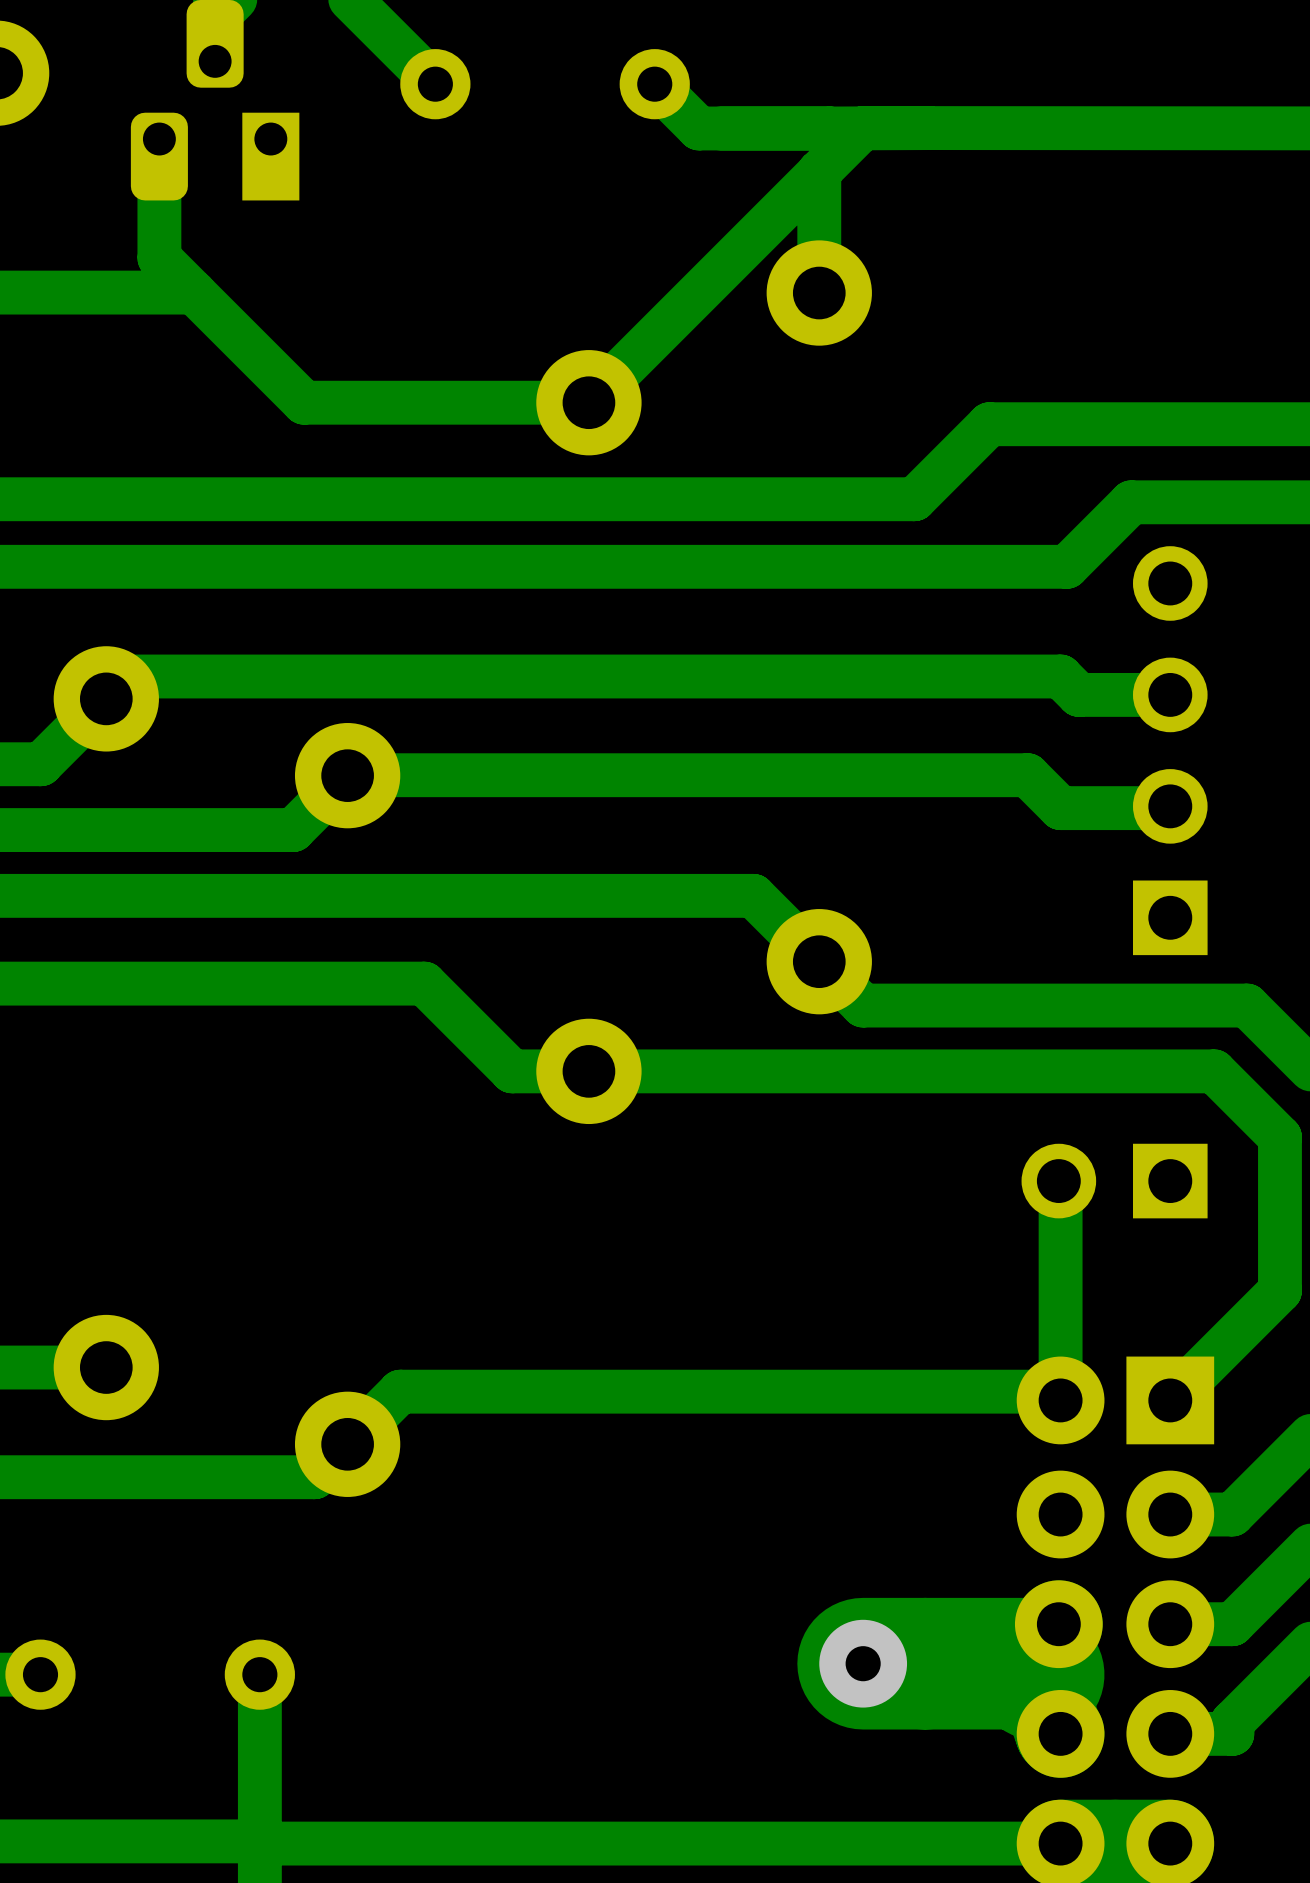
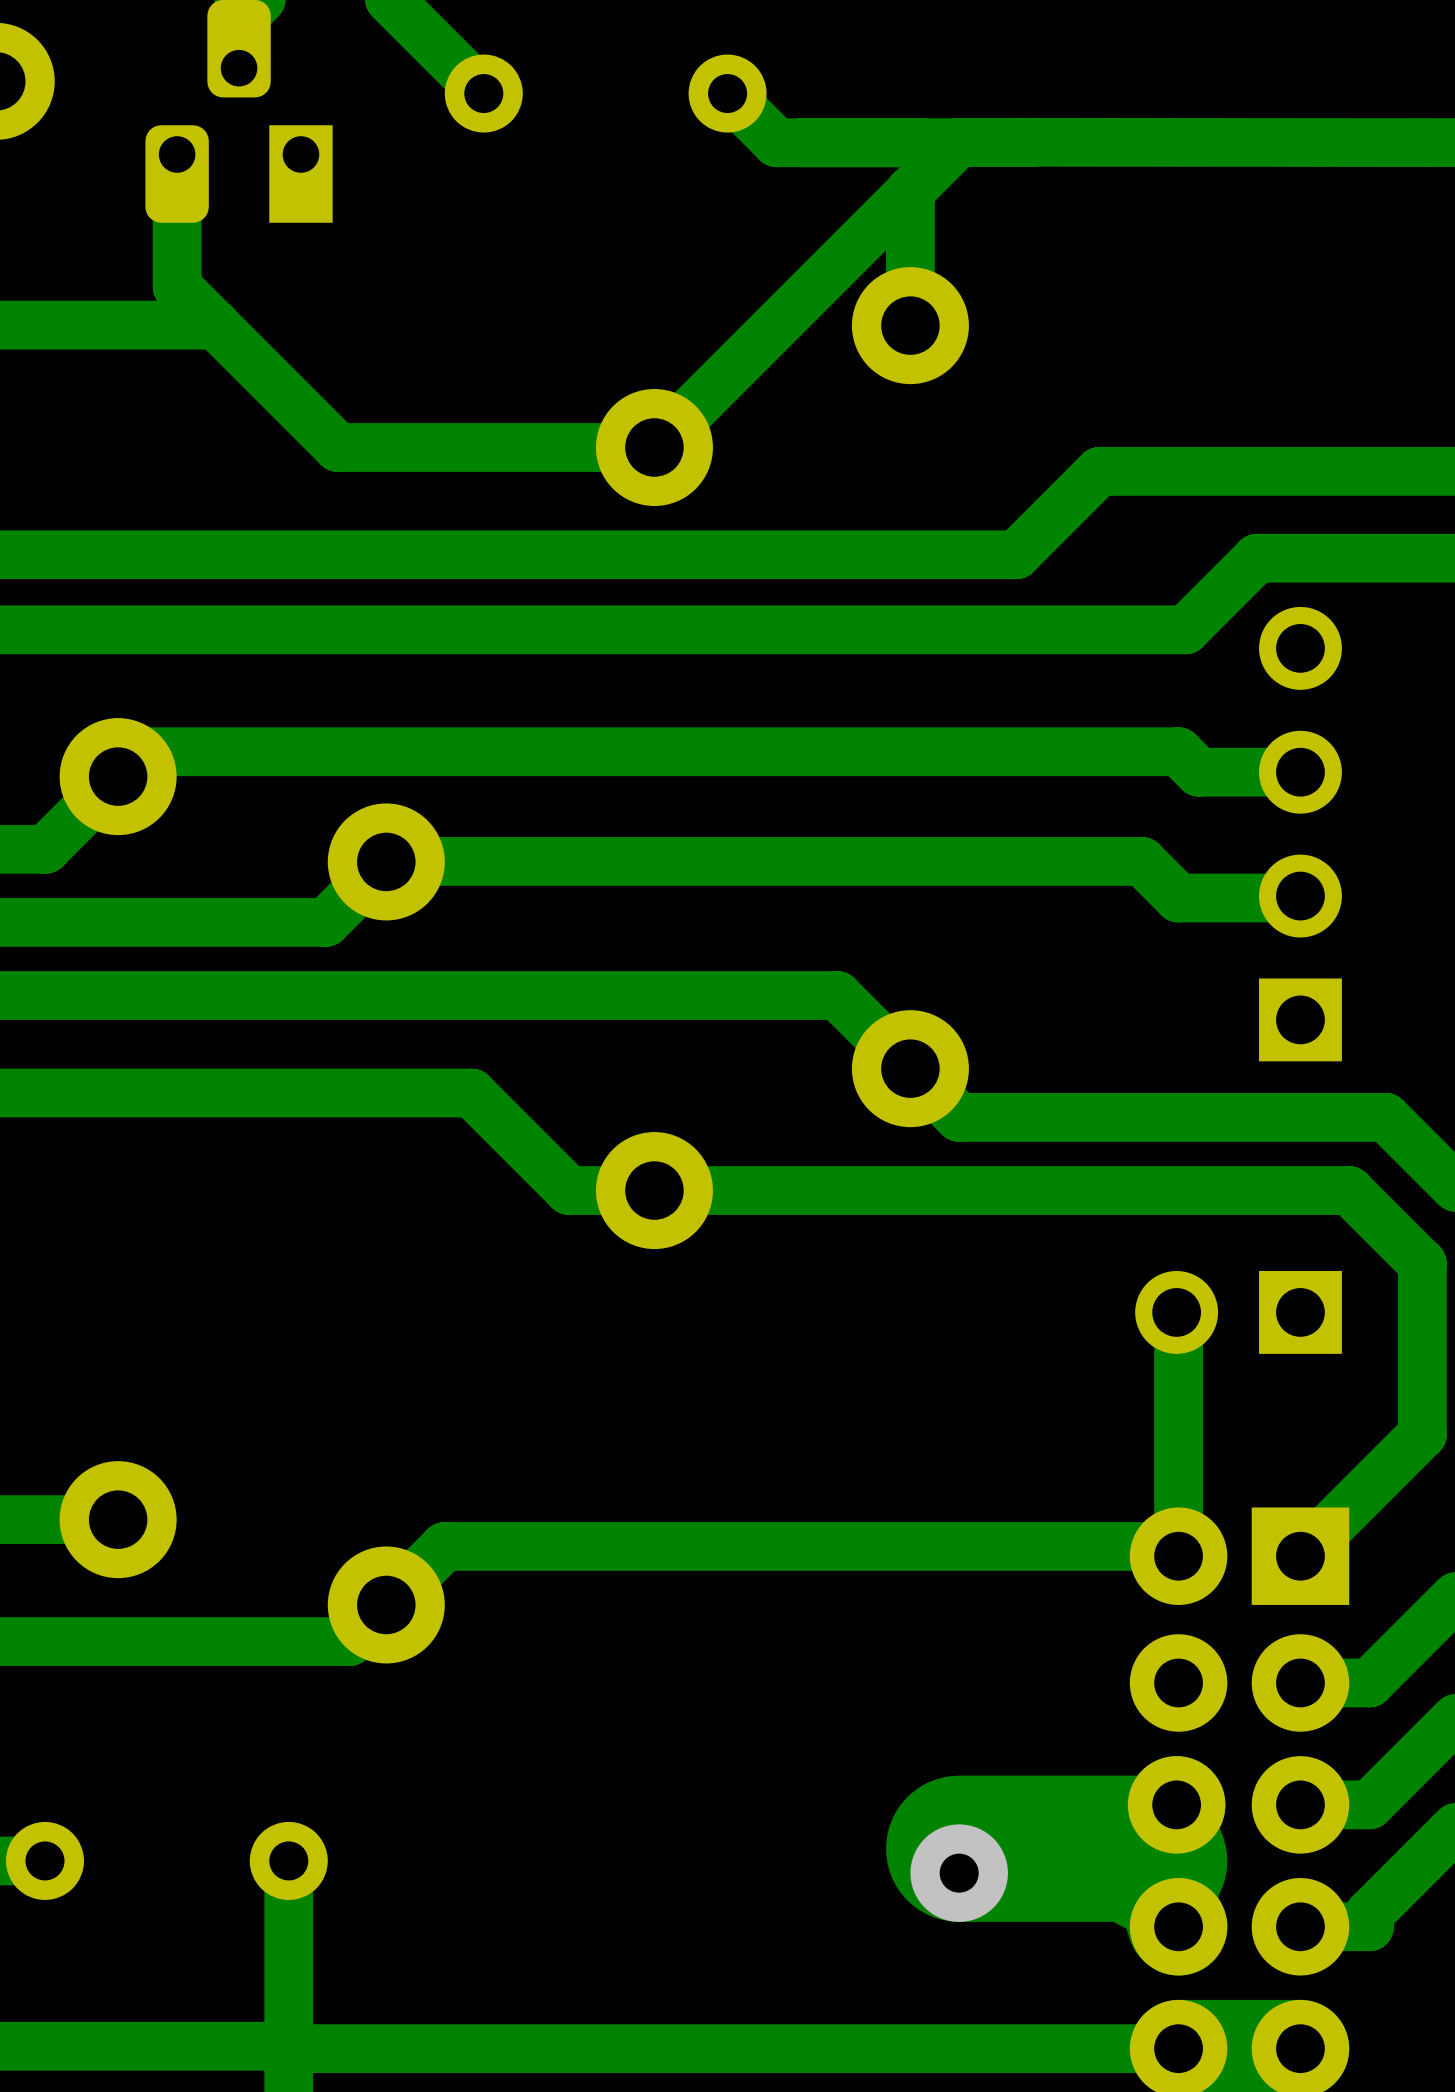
via position: (863, 1663) -> (959, 1873)

